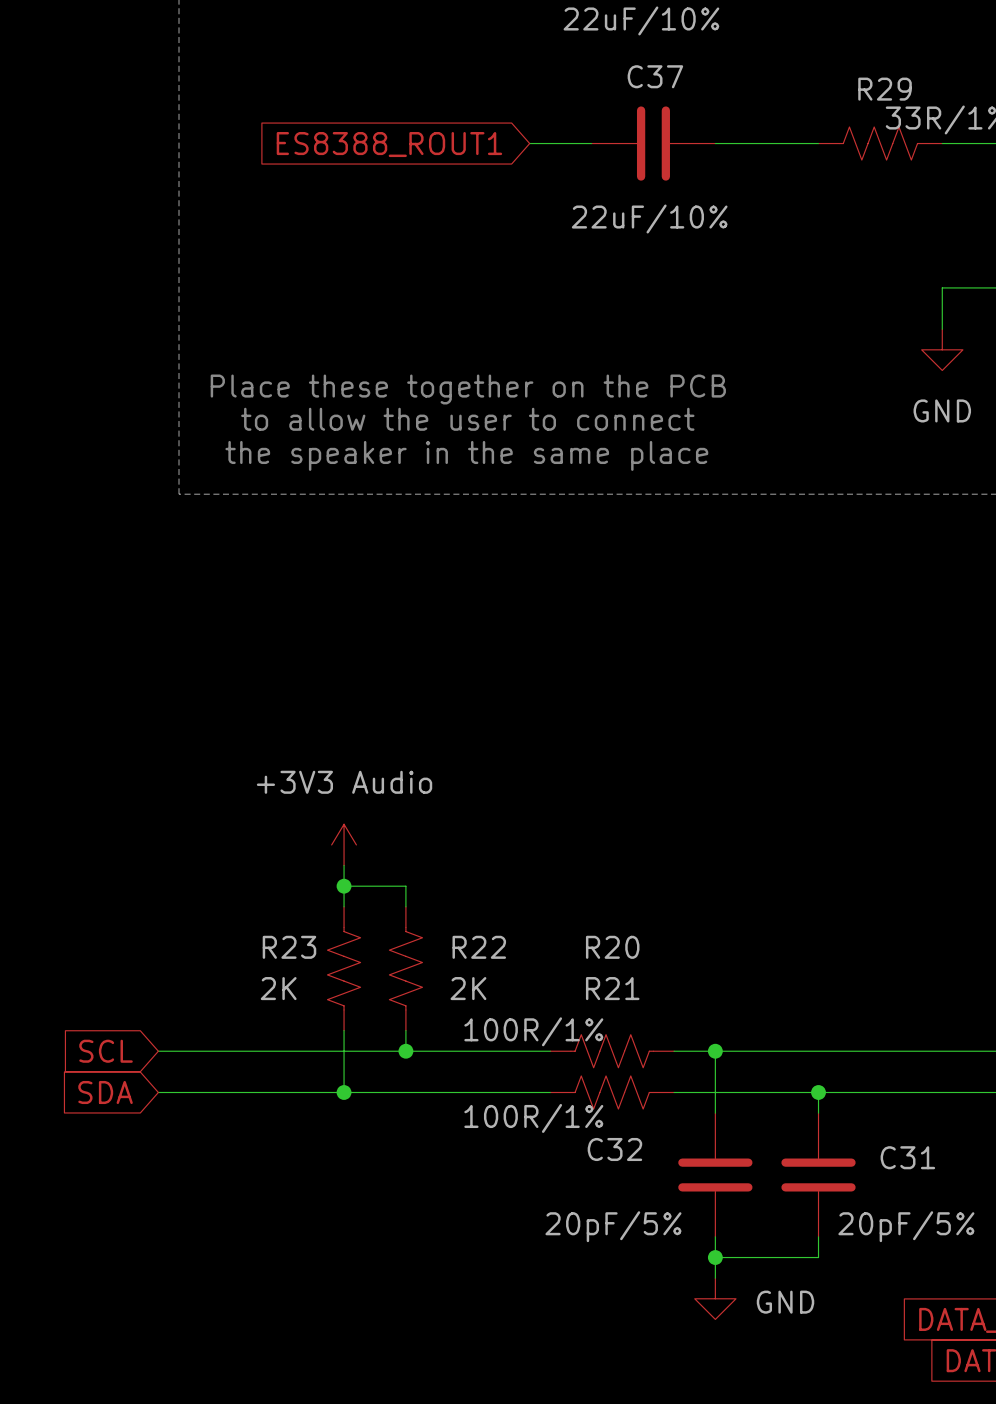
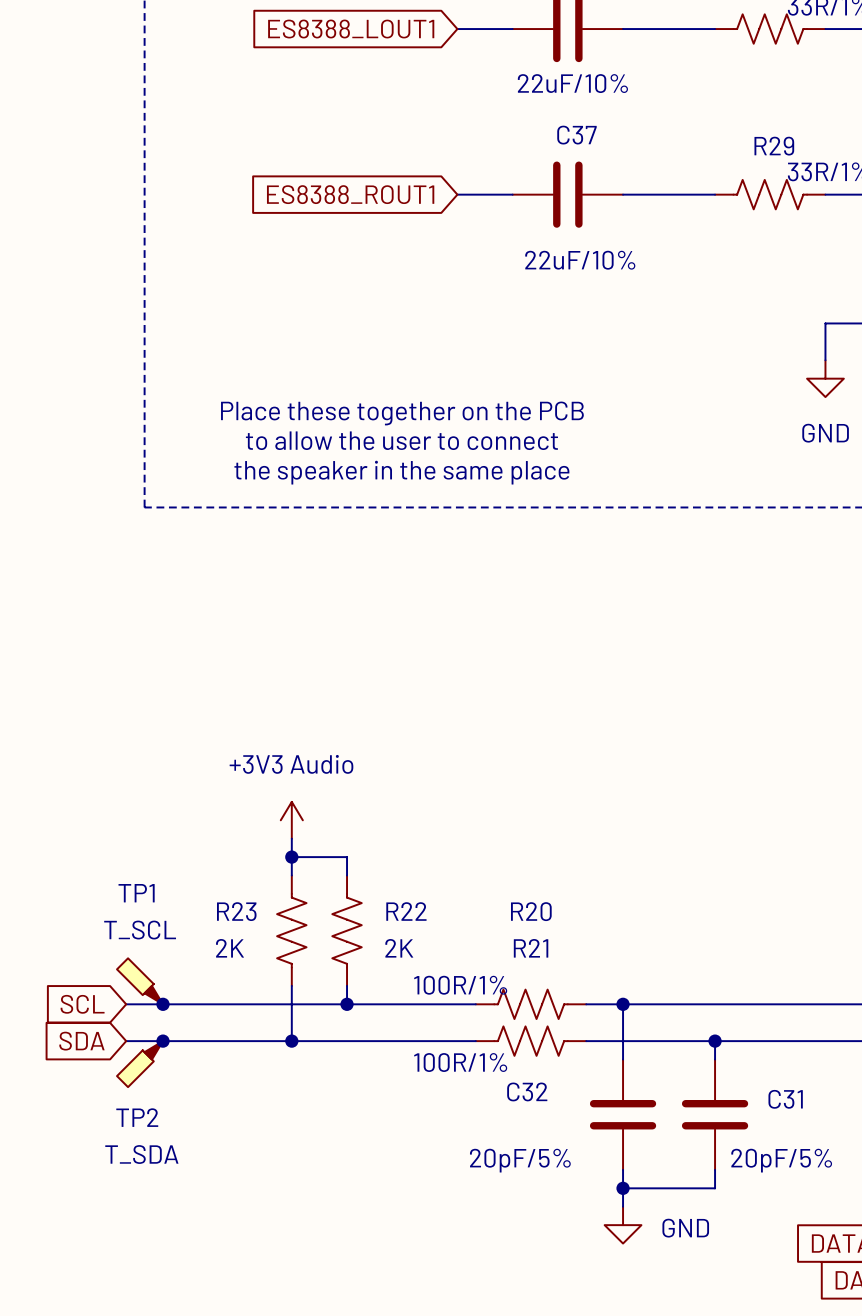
TP1: none -> T_SCL (140, 981)
junction: none -> (163, 1004)
junction: none -> (163, 1041)
TP2: none -> T_SDA (140, 1064)

